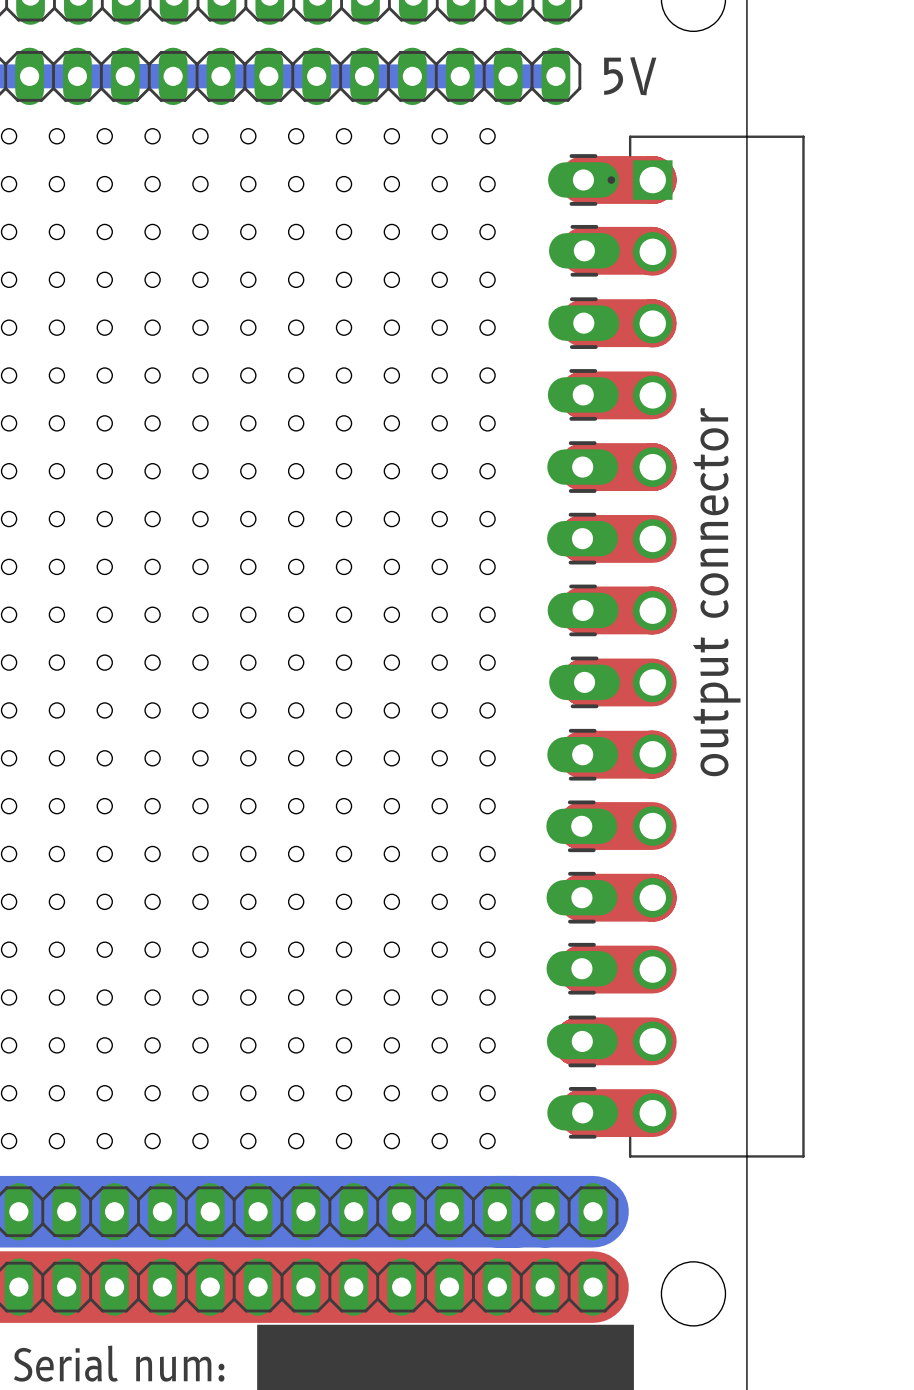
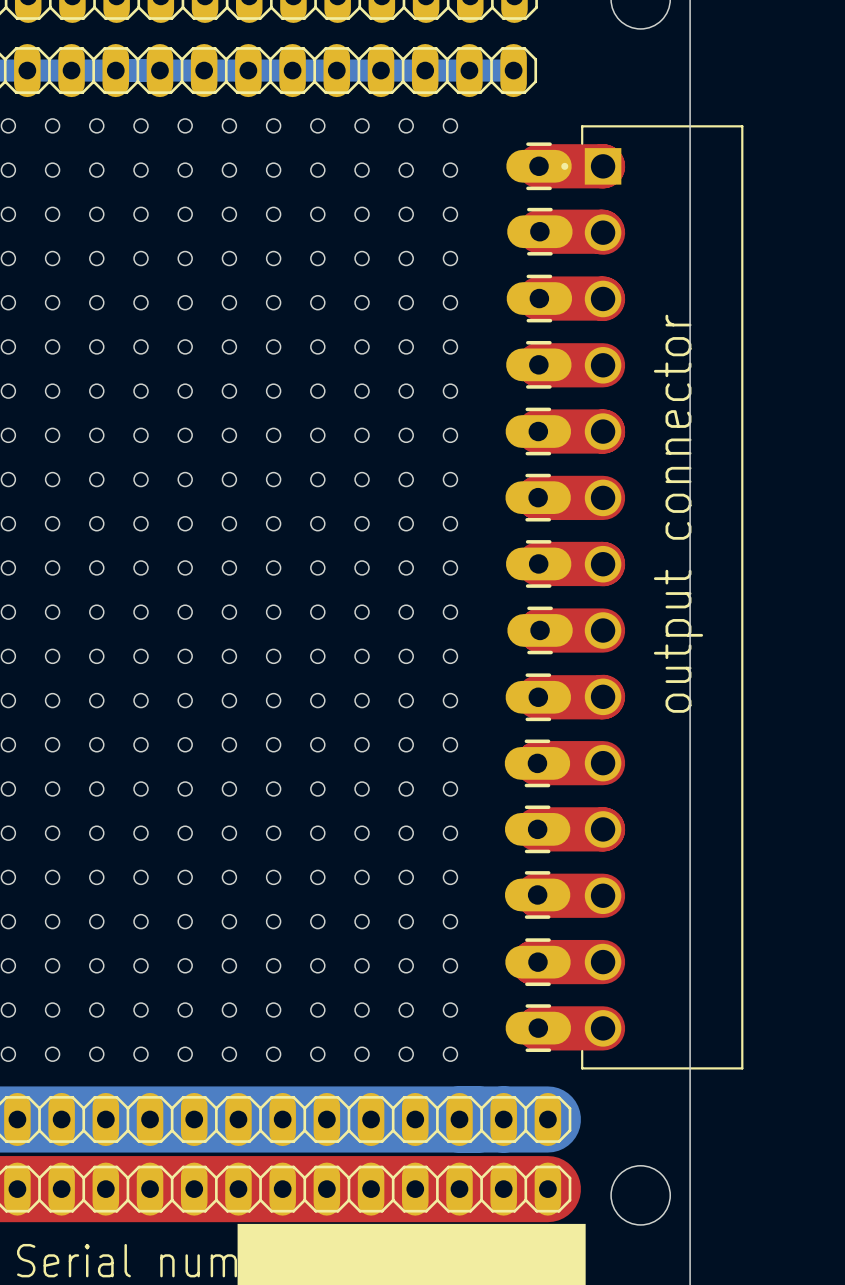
text: 5V (630, 76) -> none
text position: output connector (716, 592) -> output connector (678, 513)

